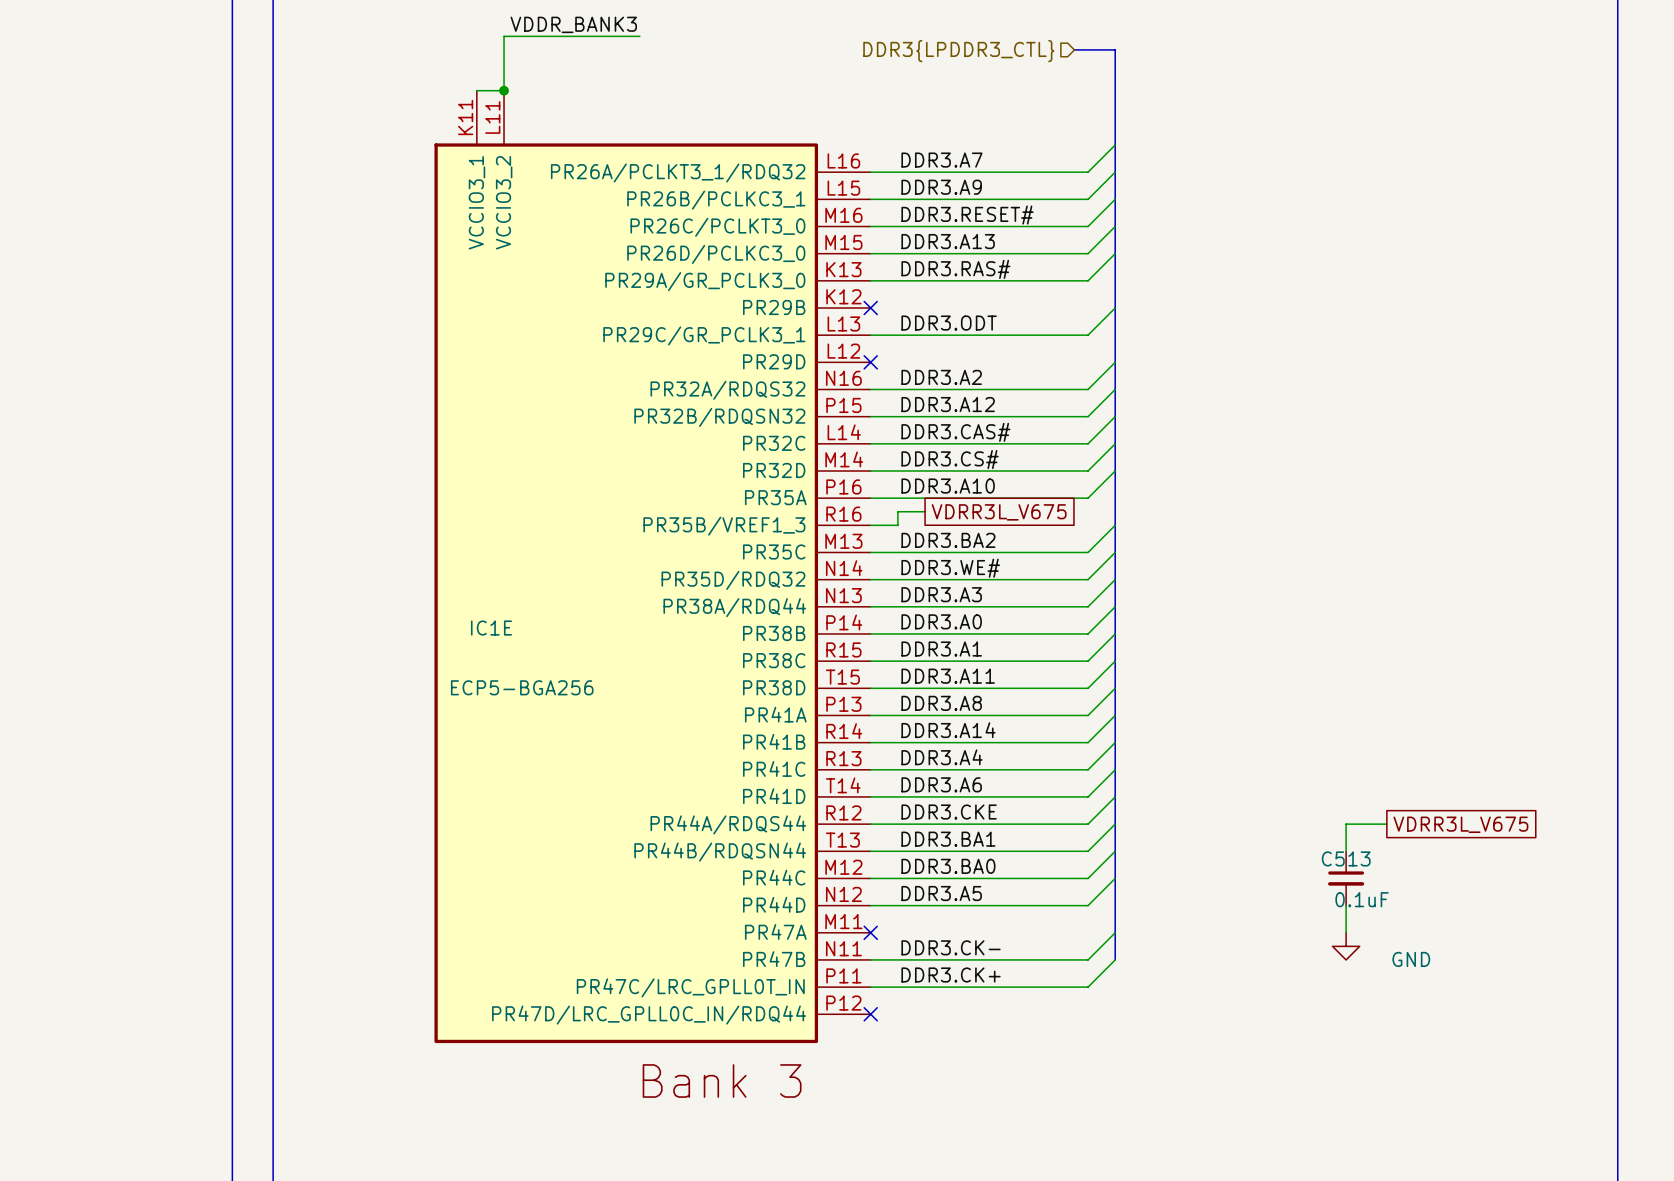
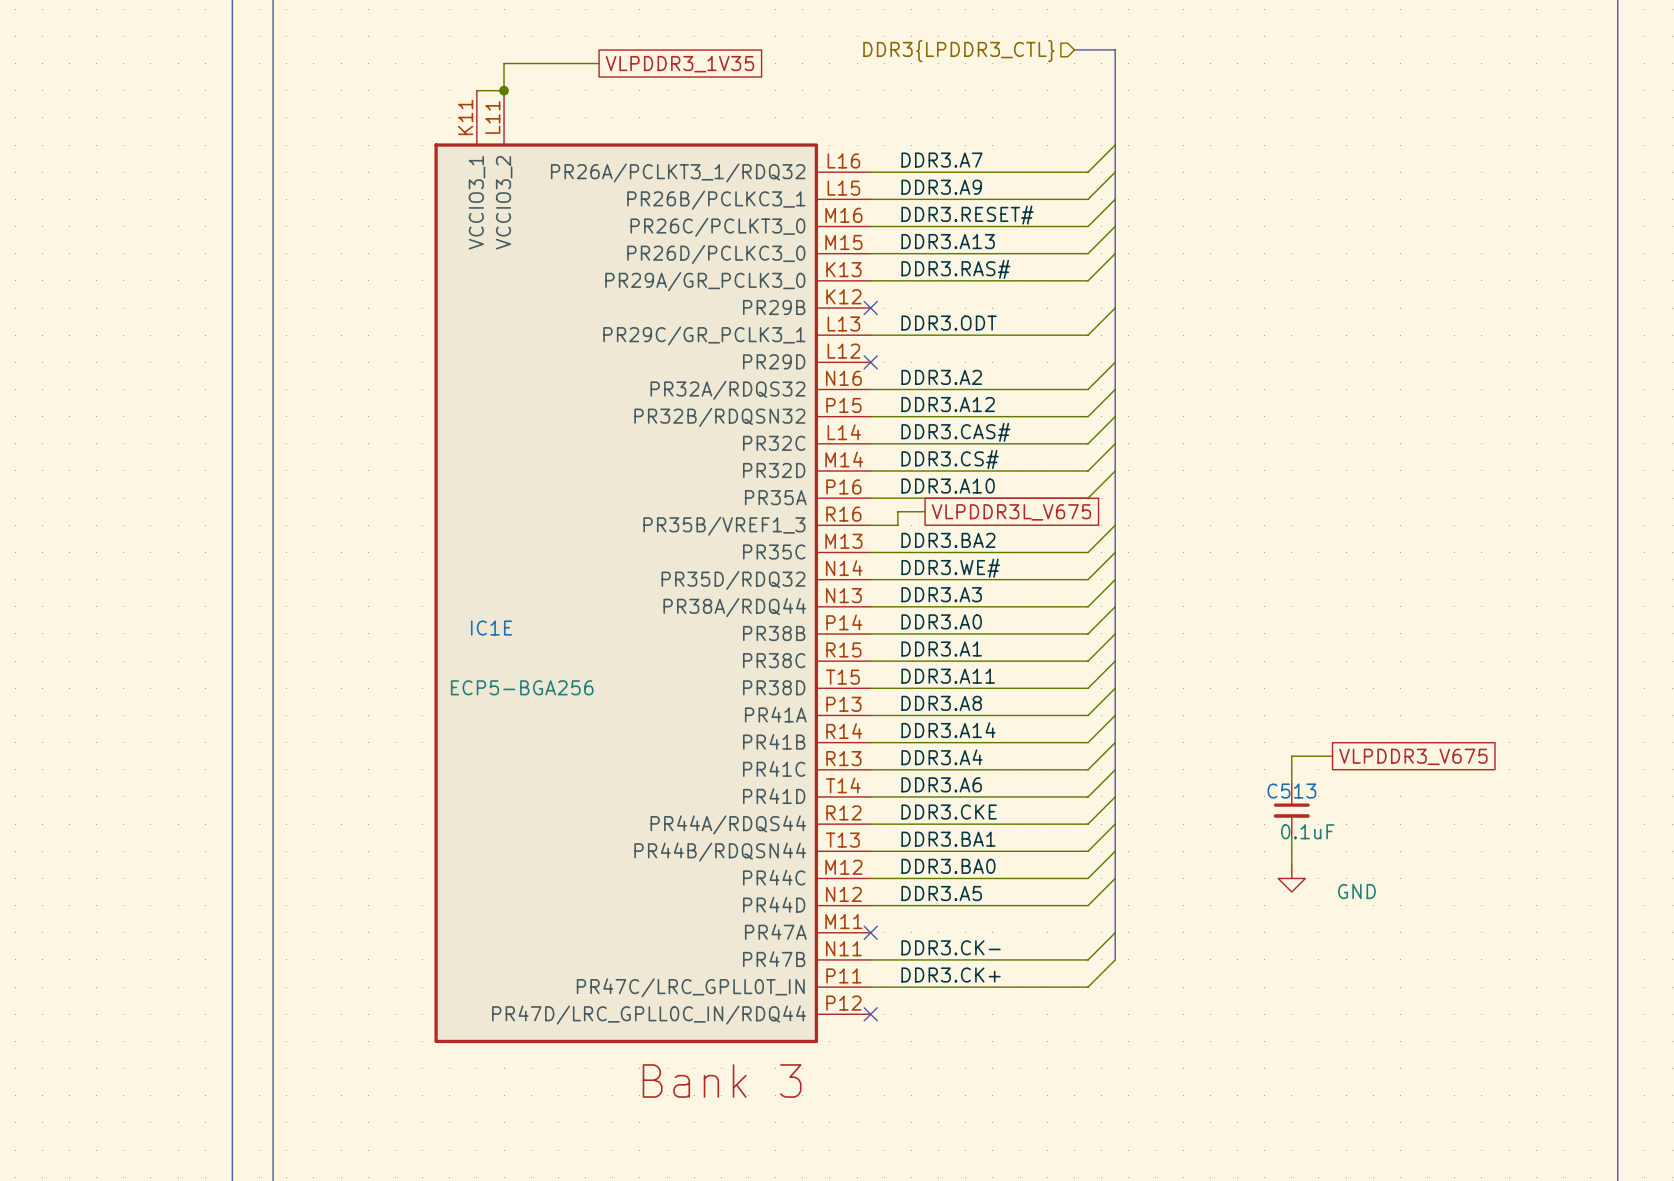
label: VDDR_BANK3 (573, 24) -> none
wire: (639, 36) (504, 36) (504, 63) -> (599, 63) (504, 63)
global label: none -> VLPDDR3_1V35 (679, 64)
global label: VDRR3L_V675 (999, 512) -> VLPDDR3L_V675 (1011, 512)
global label: none -> VLPDDR3_V675 (1413, 756)
wire: (1386, 824) (1346, 824) (1346, 851) -> (1332, 756) (1291, 756) (1291, 783)
global label: VDRR3L_V675 (1460, 824) -> none
C513 position: (1346, 878) -> (1291, 810)
wire: (1346, 905) (1346, 932) -> (1291, 837) (1291, 864)
power symbol position: GND (1346, 946) -> GND (1291, 878)

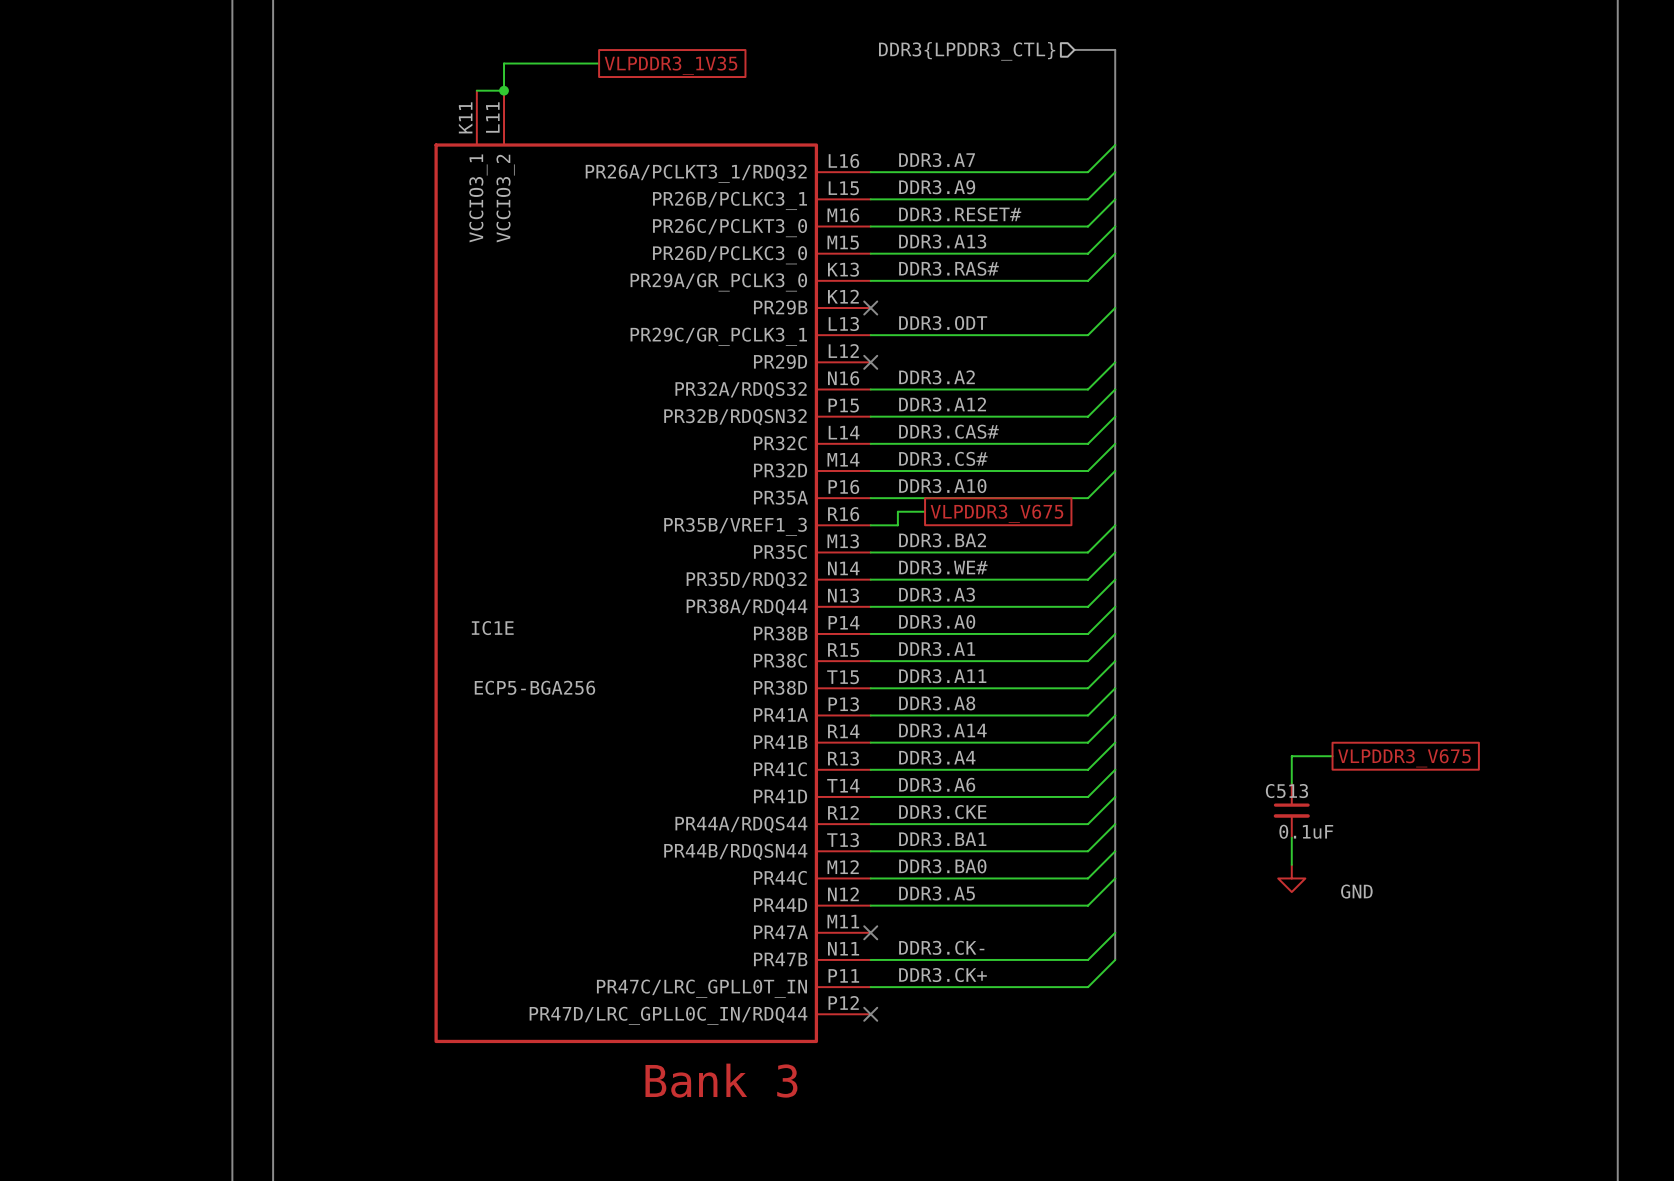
global label: VLPDDR3L_V675 (1011, 512) -> VLPDDR3_V675 (996, 513)

